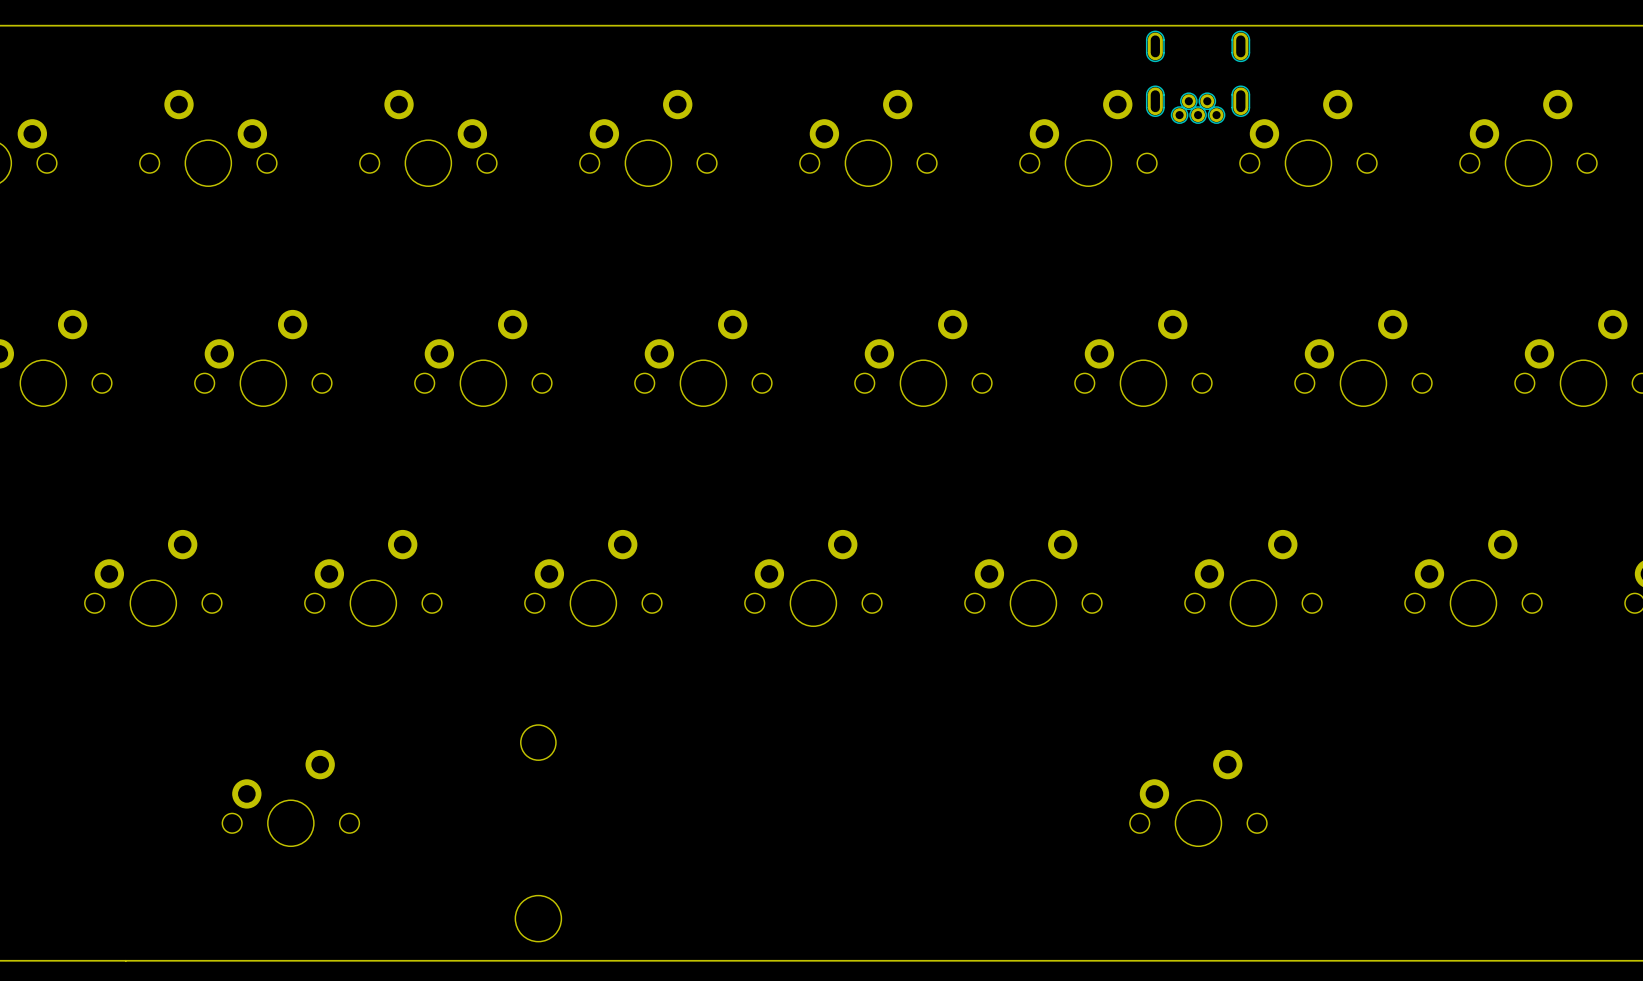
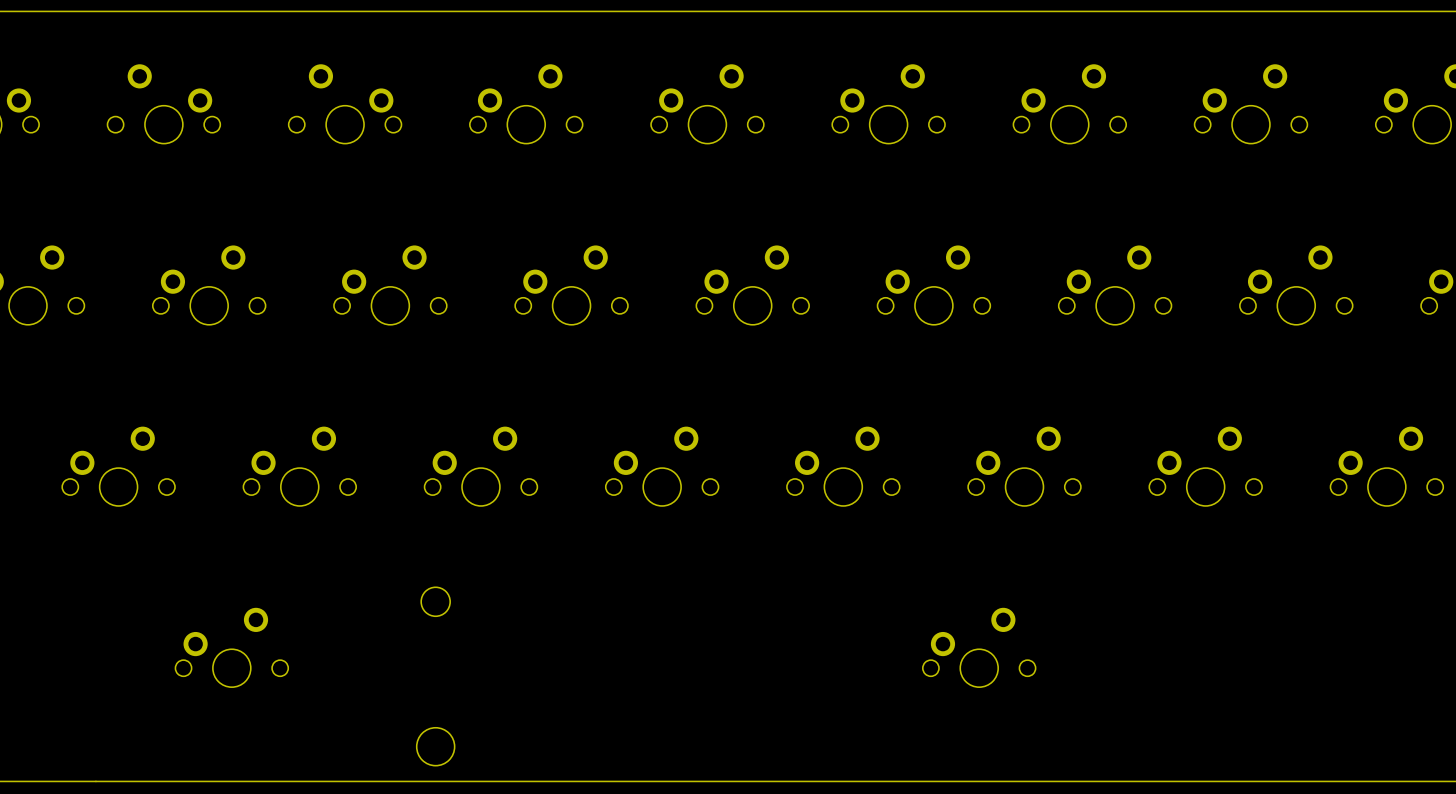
part: (1198, 77) -> none

